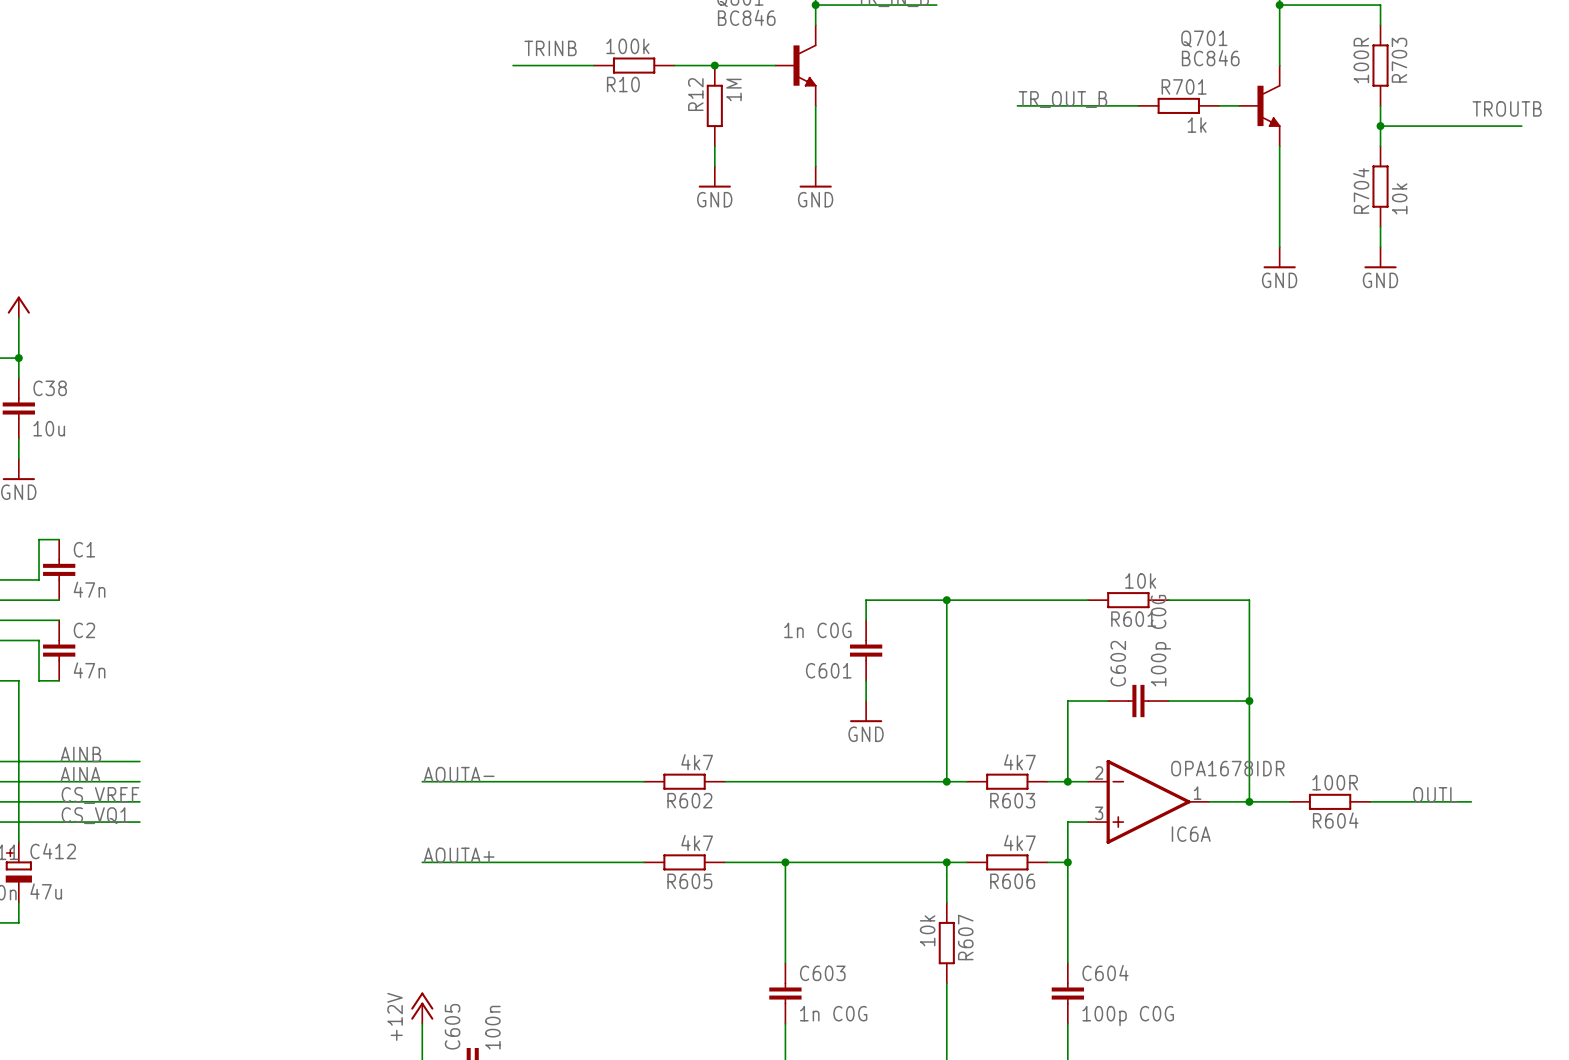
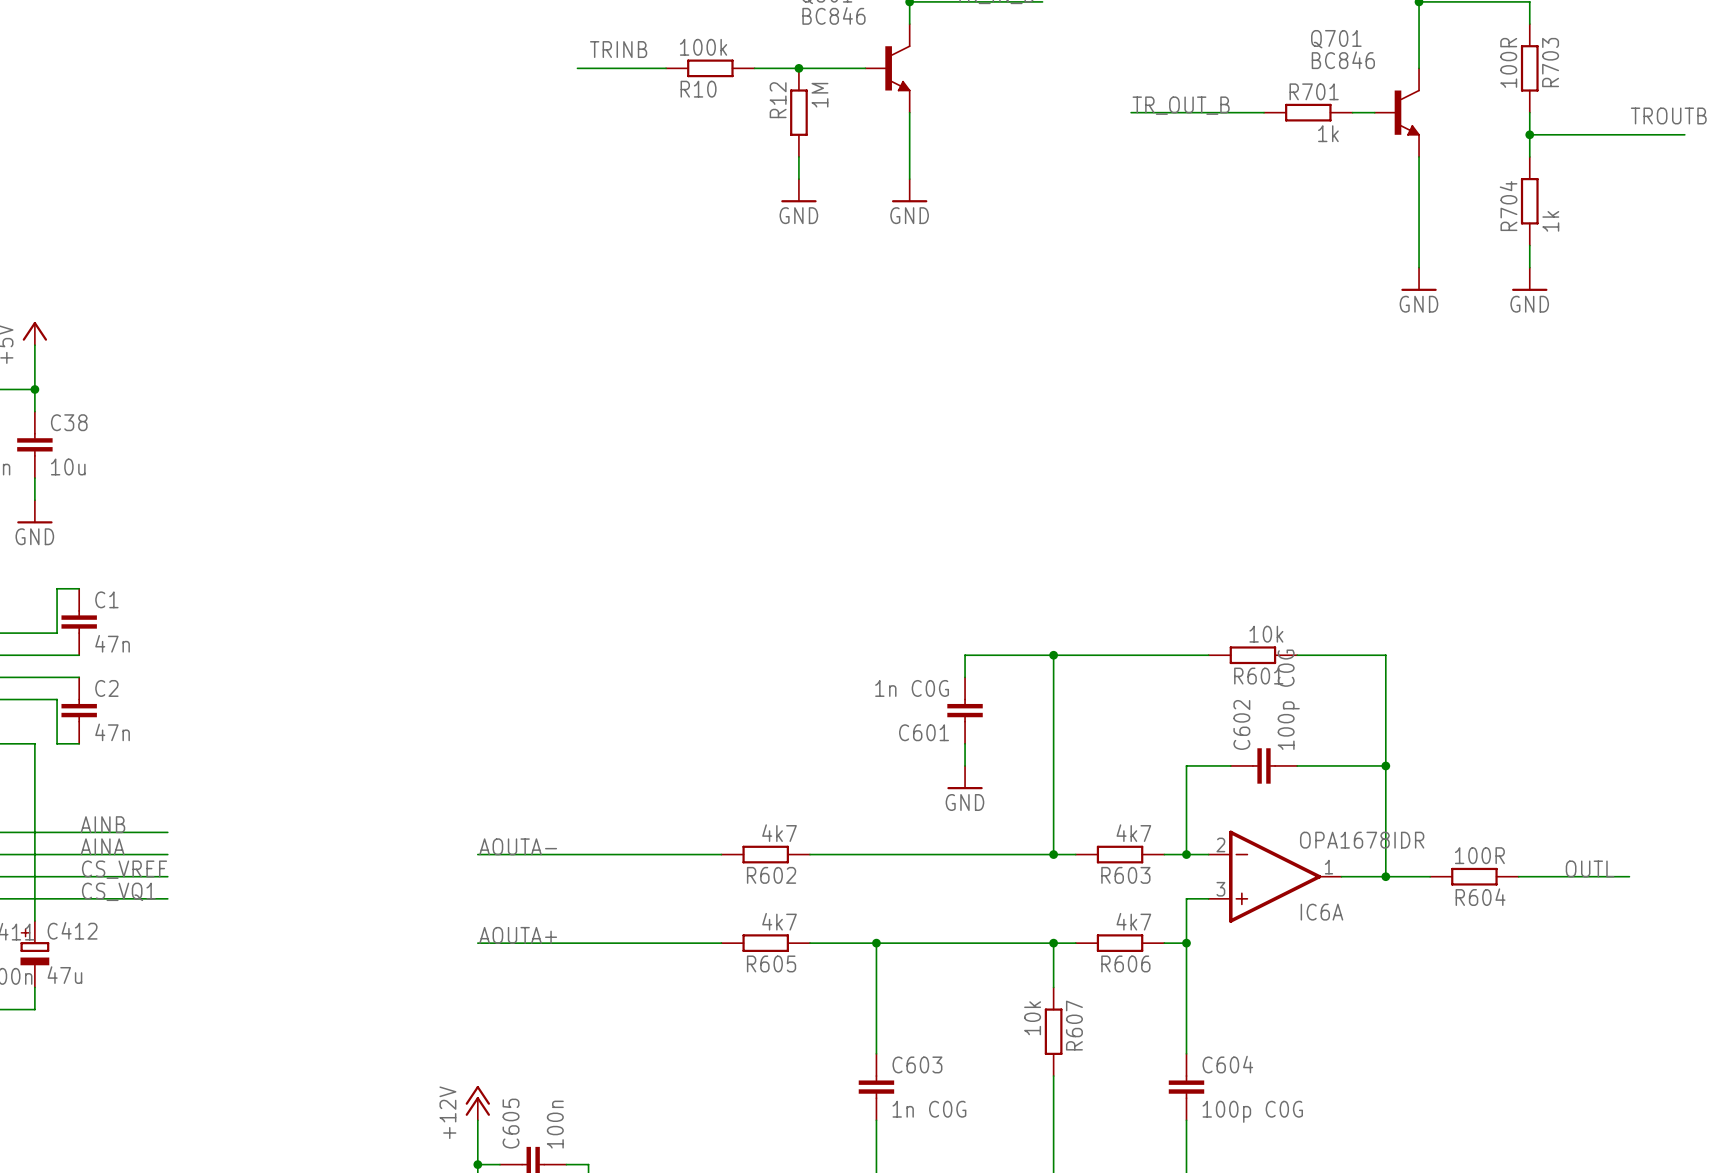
R704 value: 10k (1399, 198) -> 1k (1550, 221)

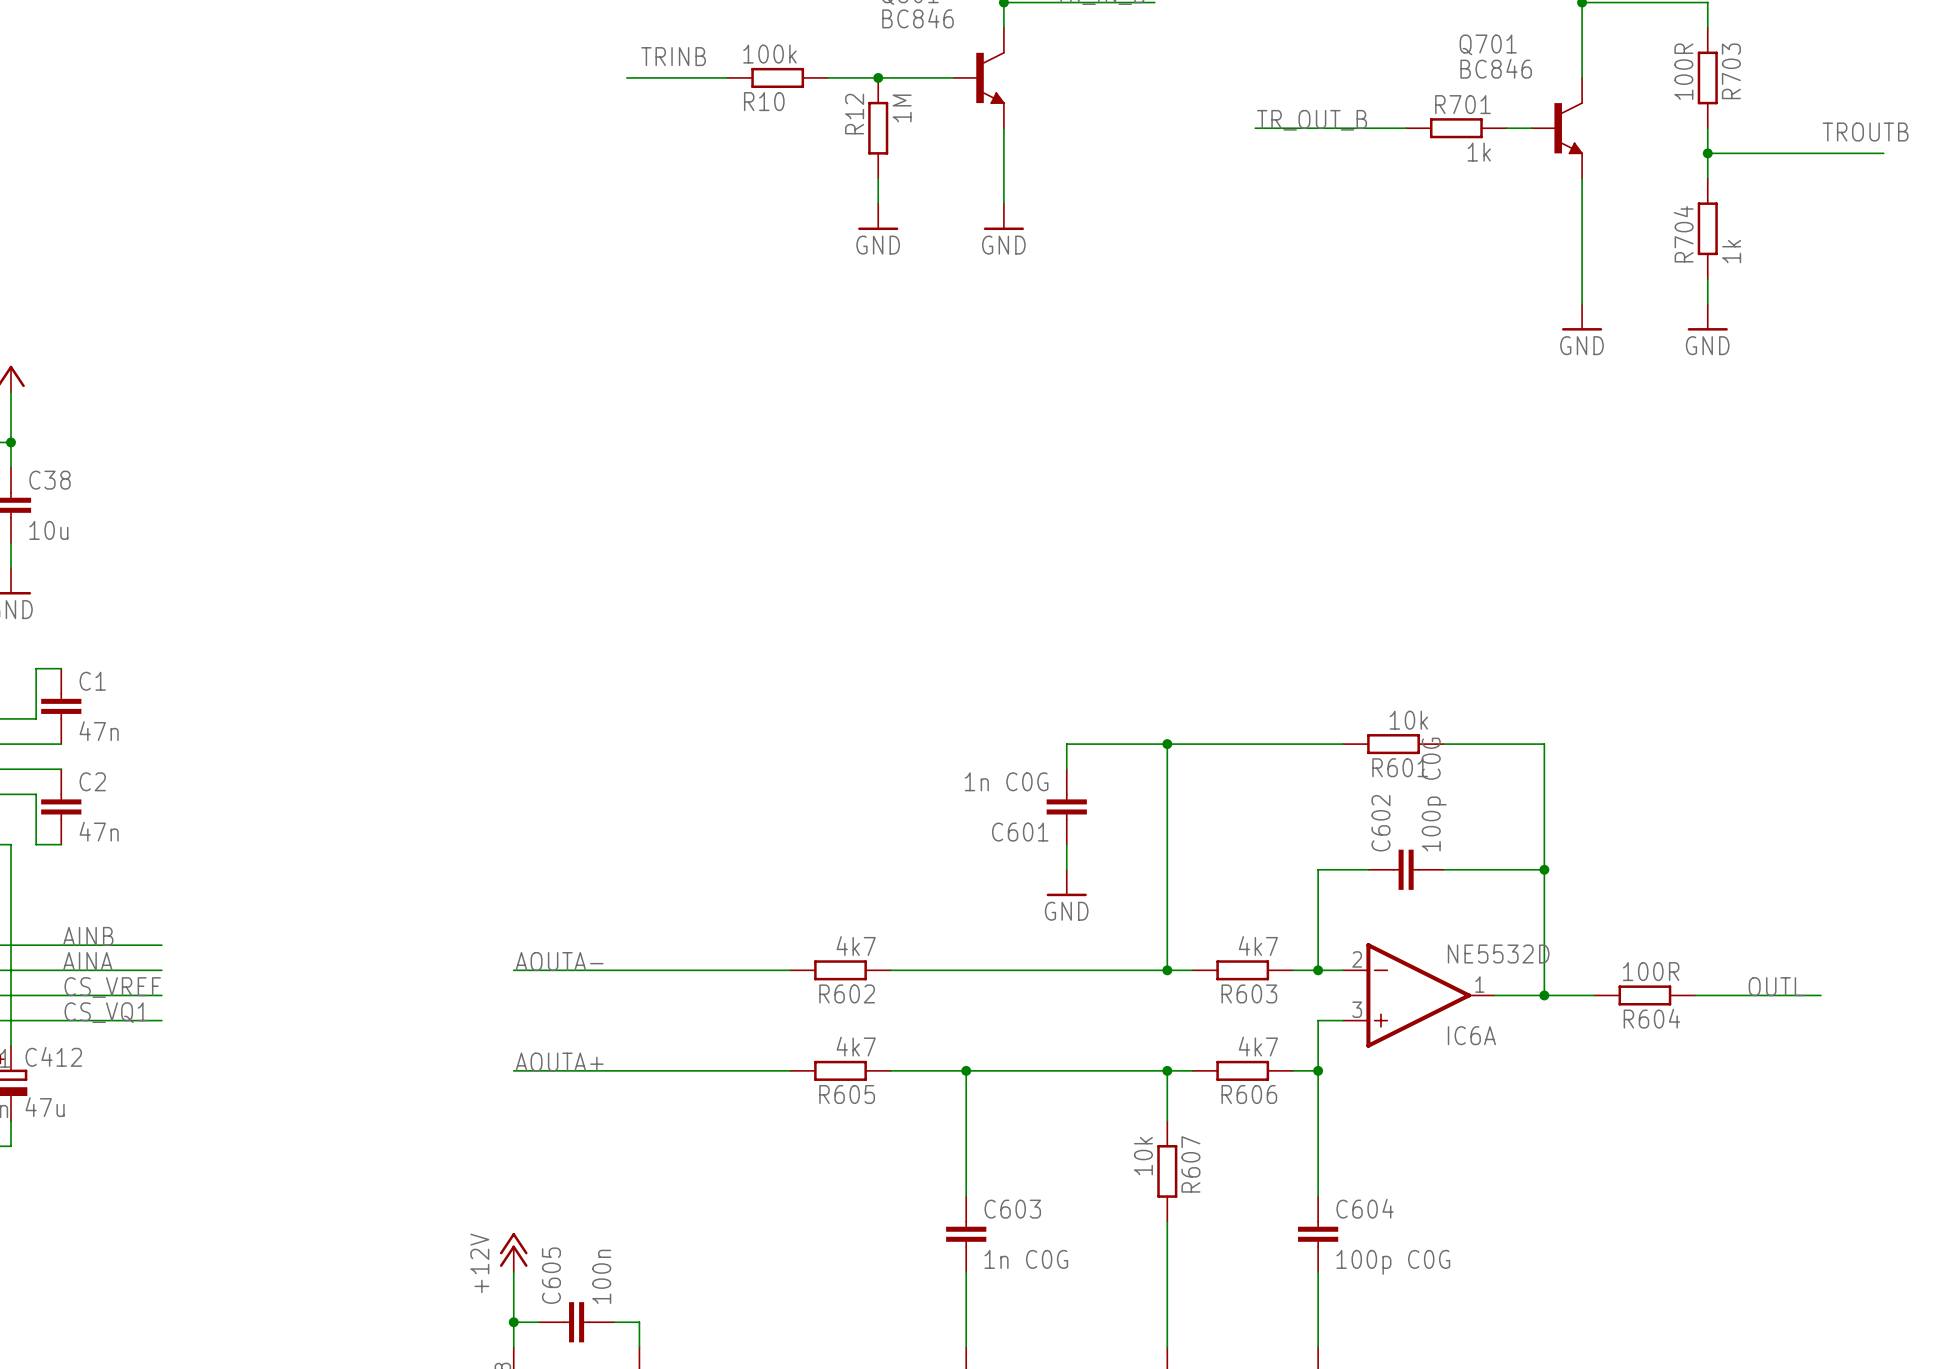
IC6A value: OPA1678IDR (1362, 840) -> NE5532D (1498, 953)

